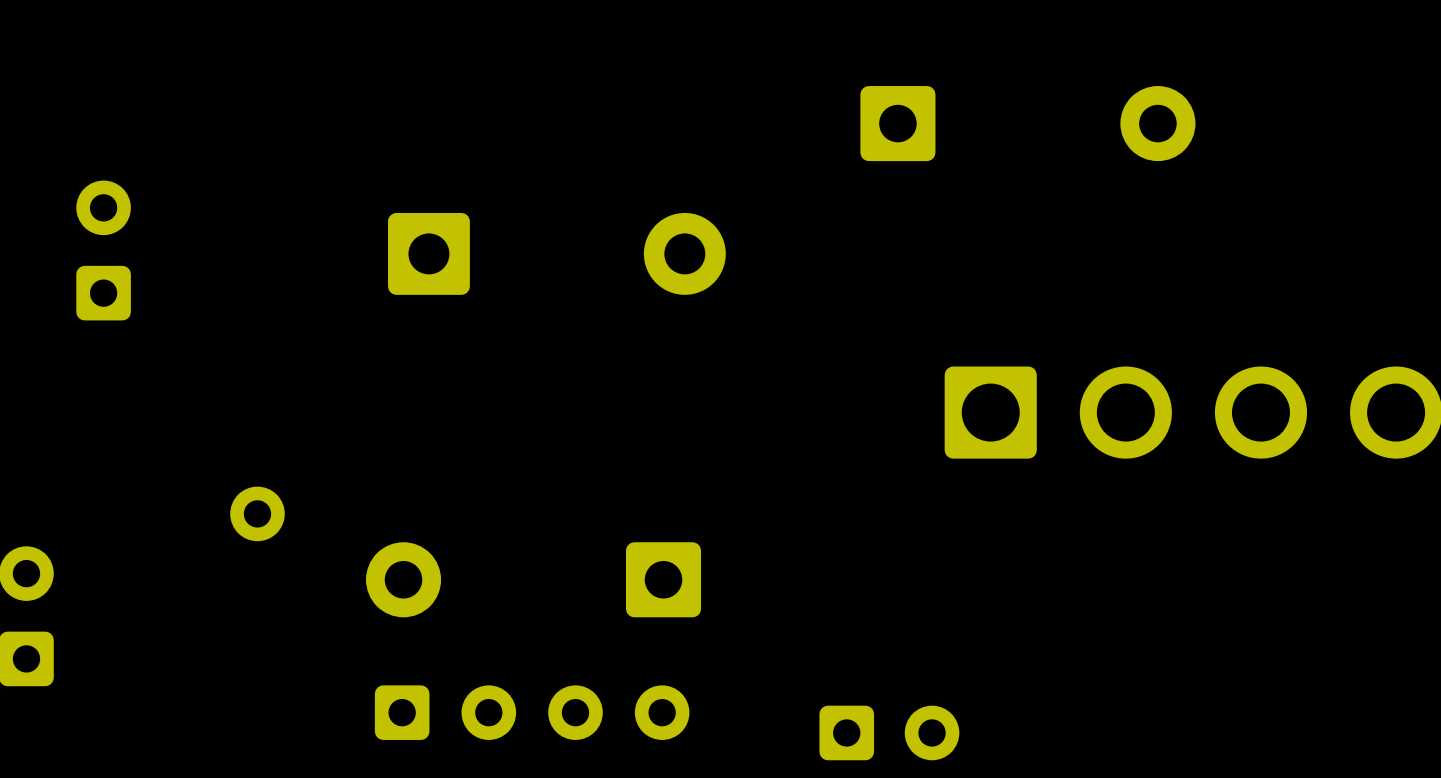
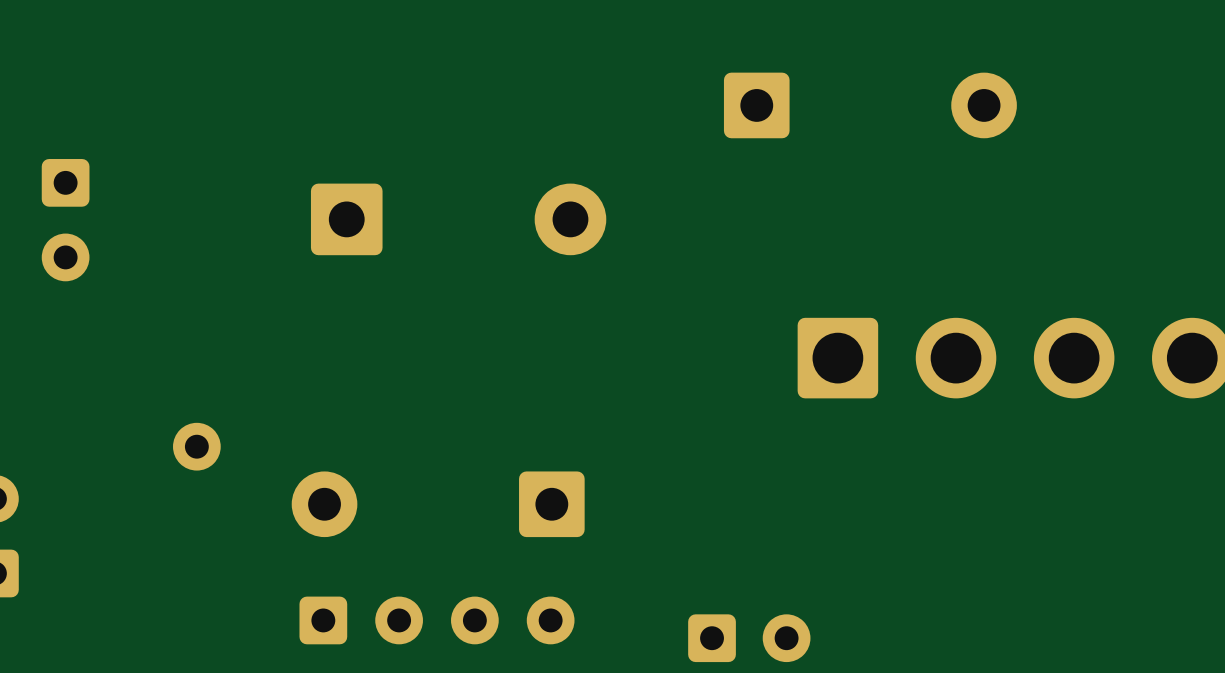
part rotation: 0° (103, 250) -> 180° (65, 220)

